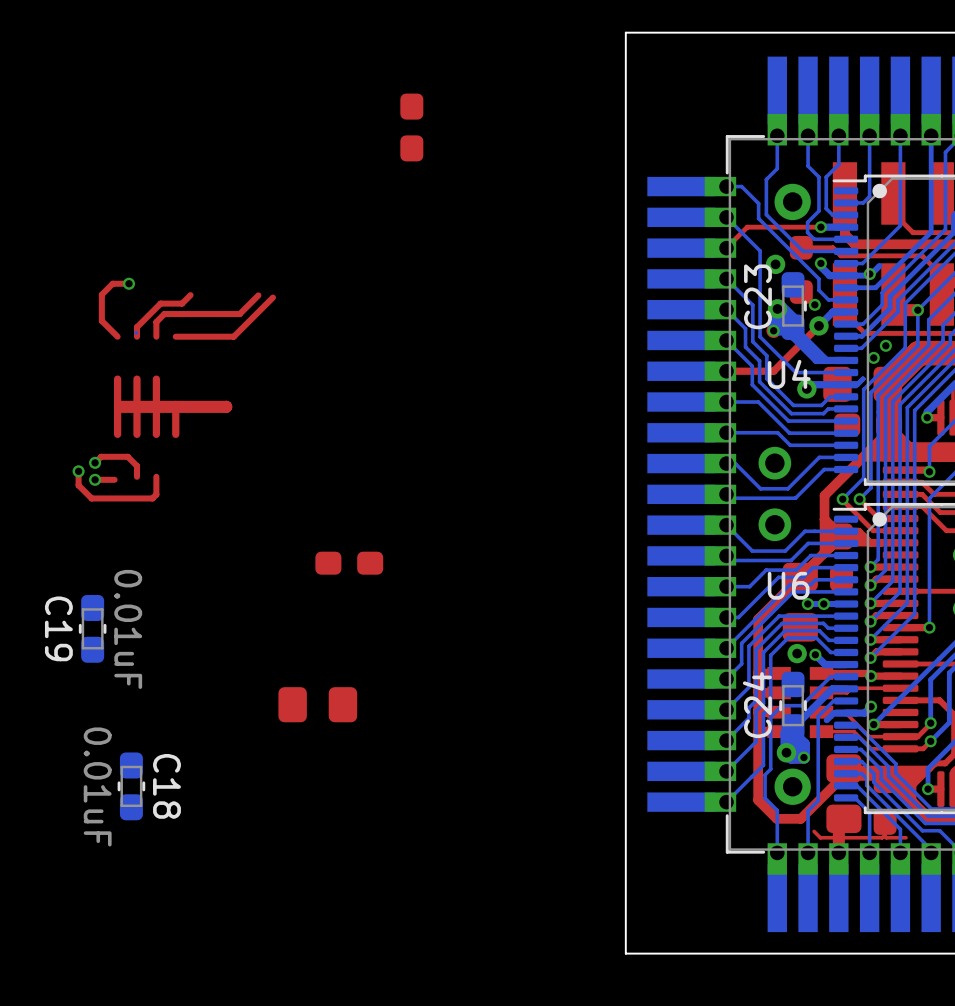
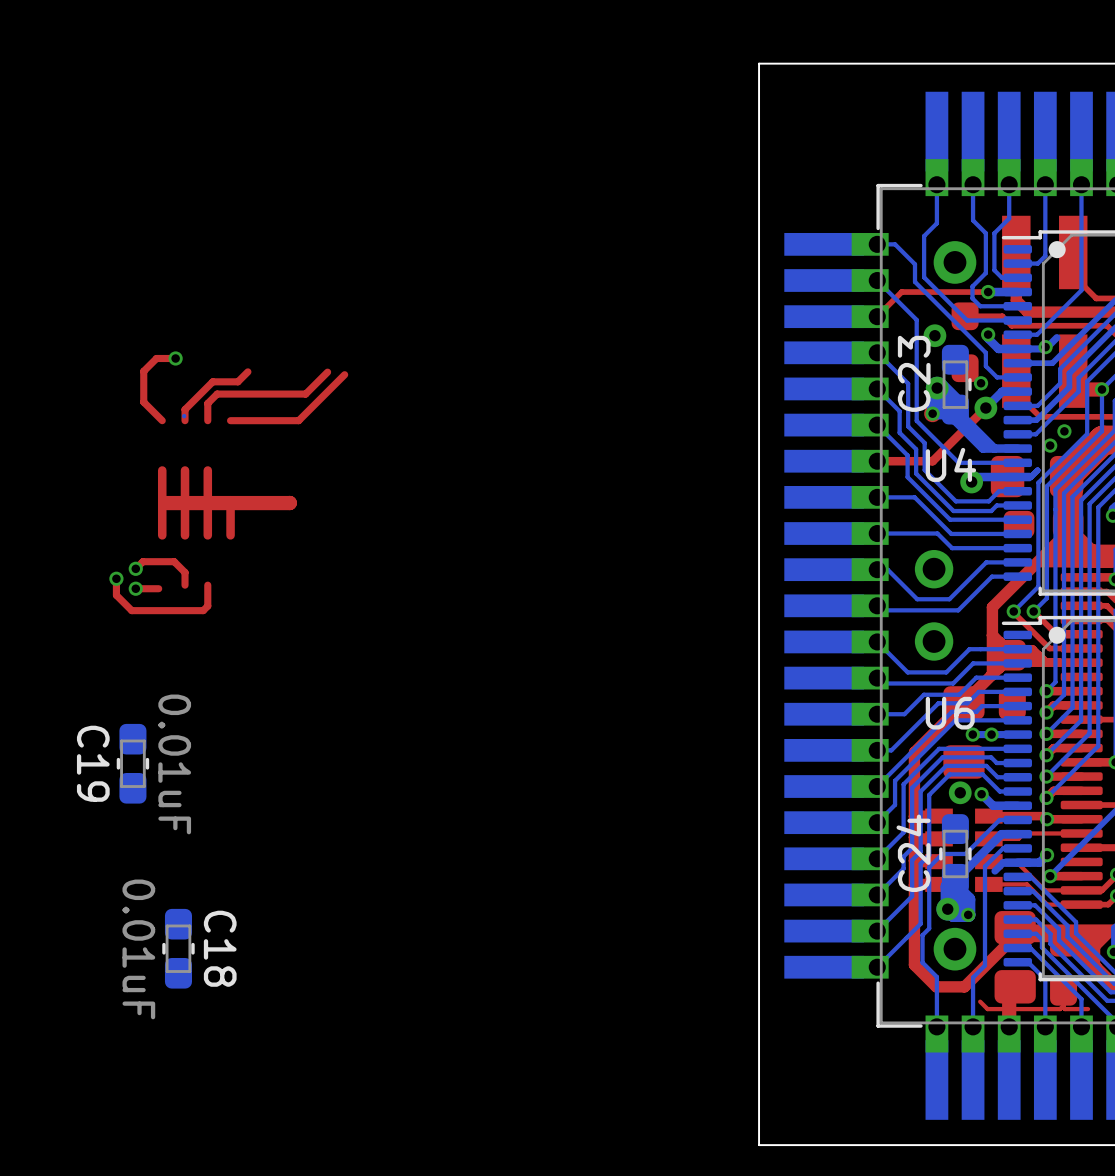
part: (411, 127) -> none
part: (349, 563) -> none
part: (317, 704) -> none

